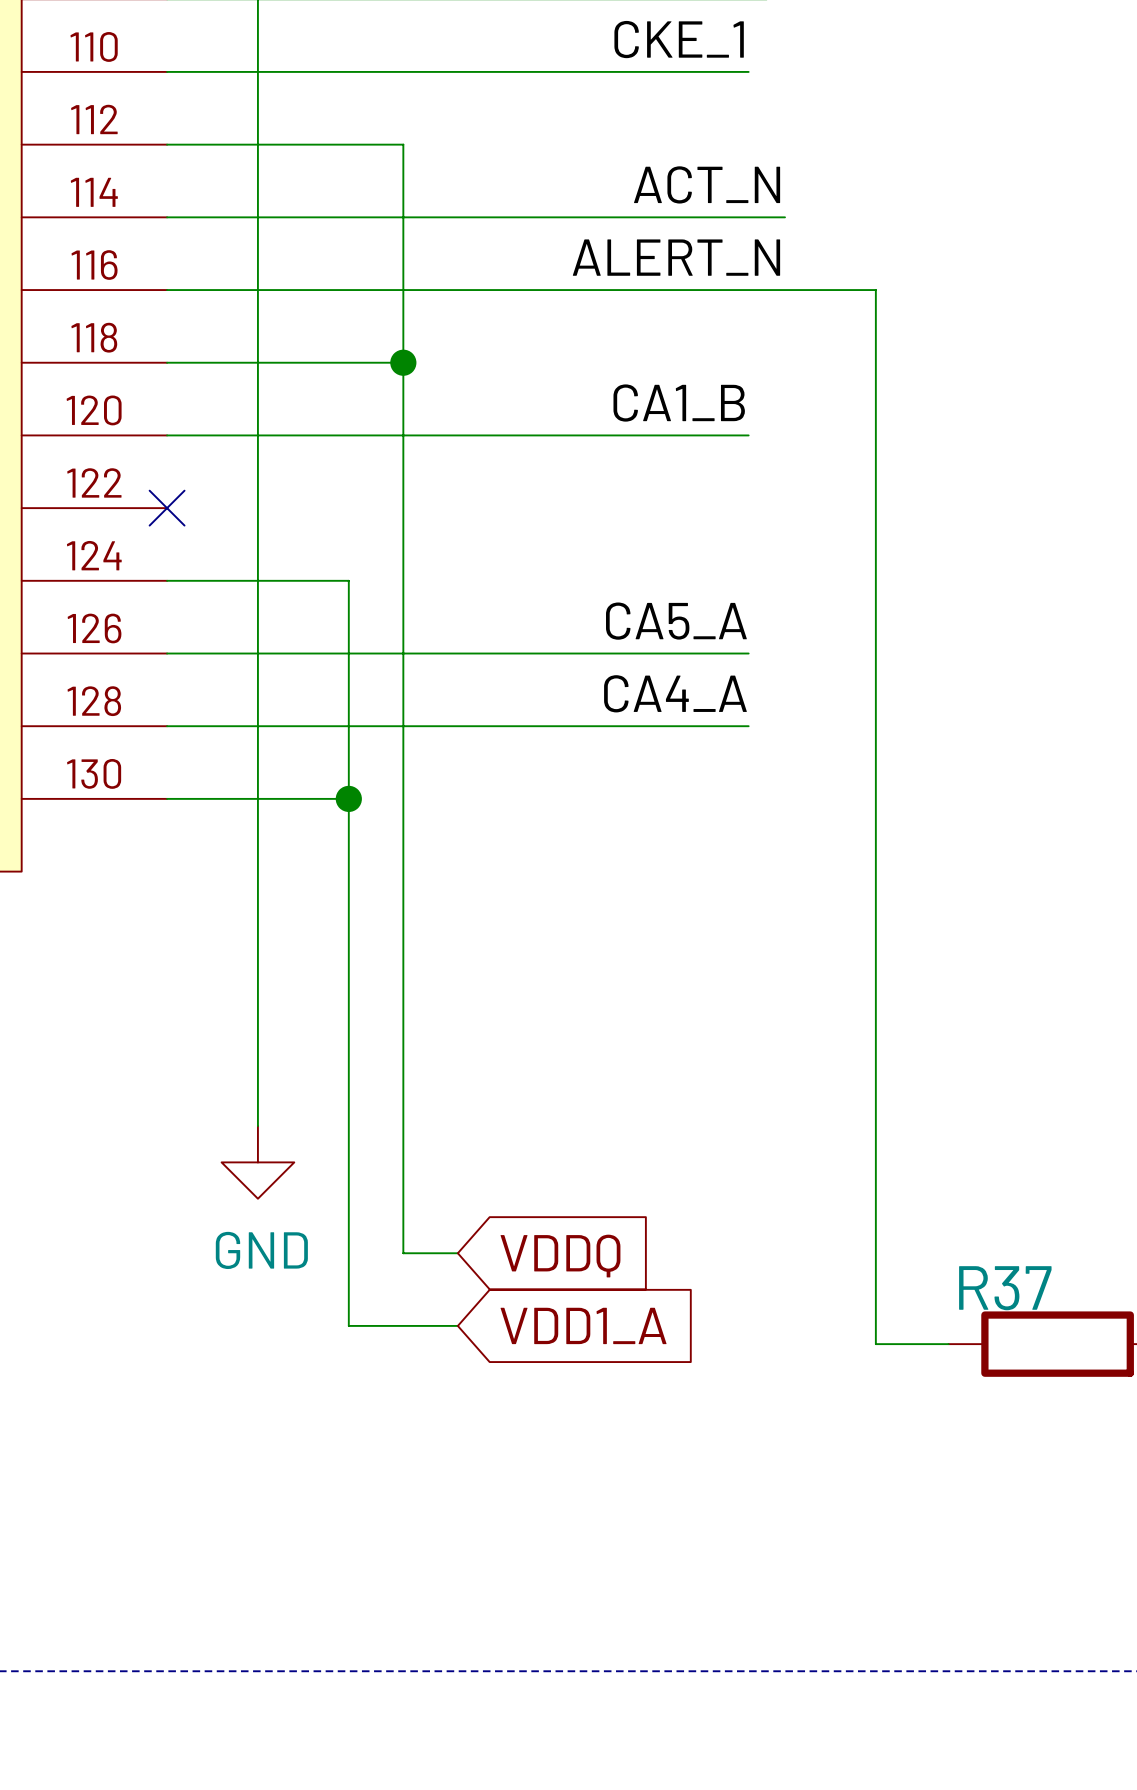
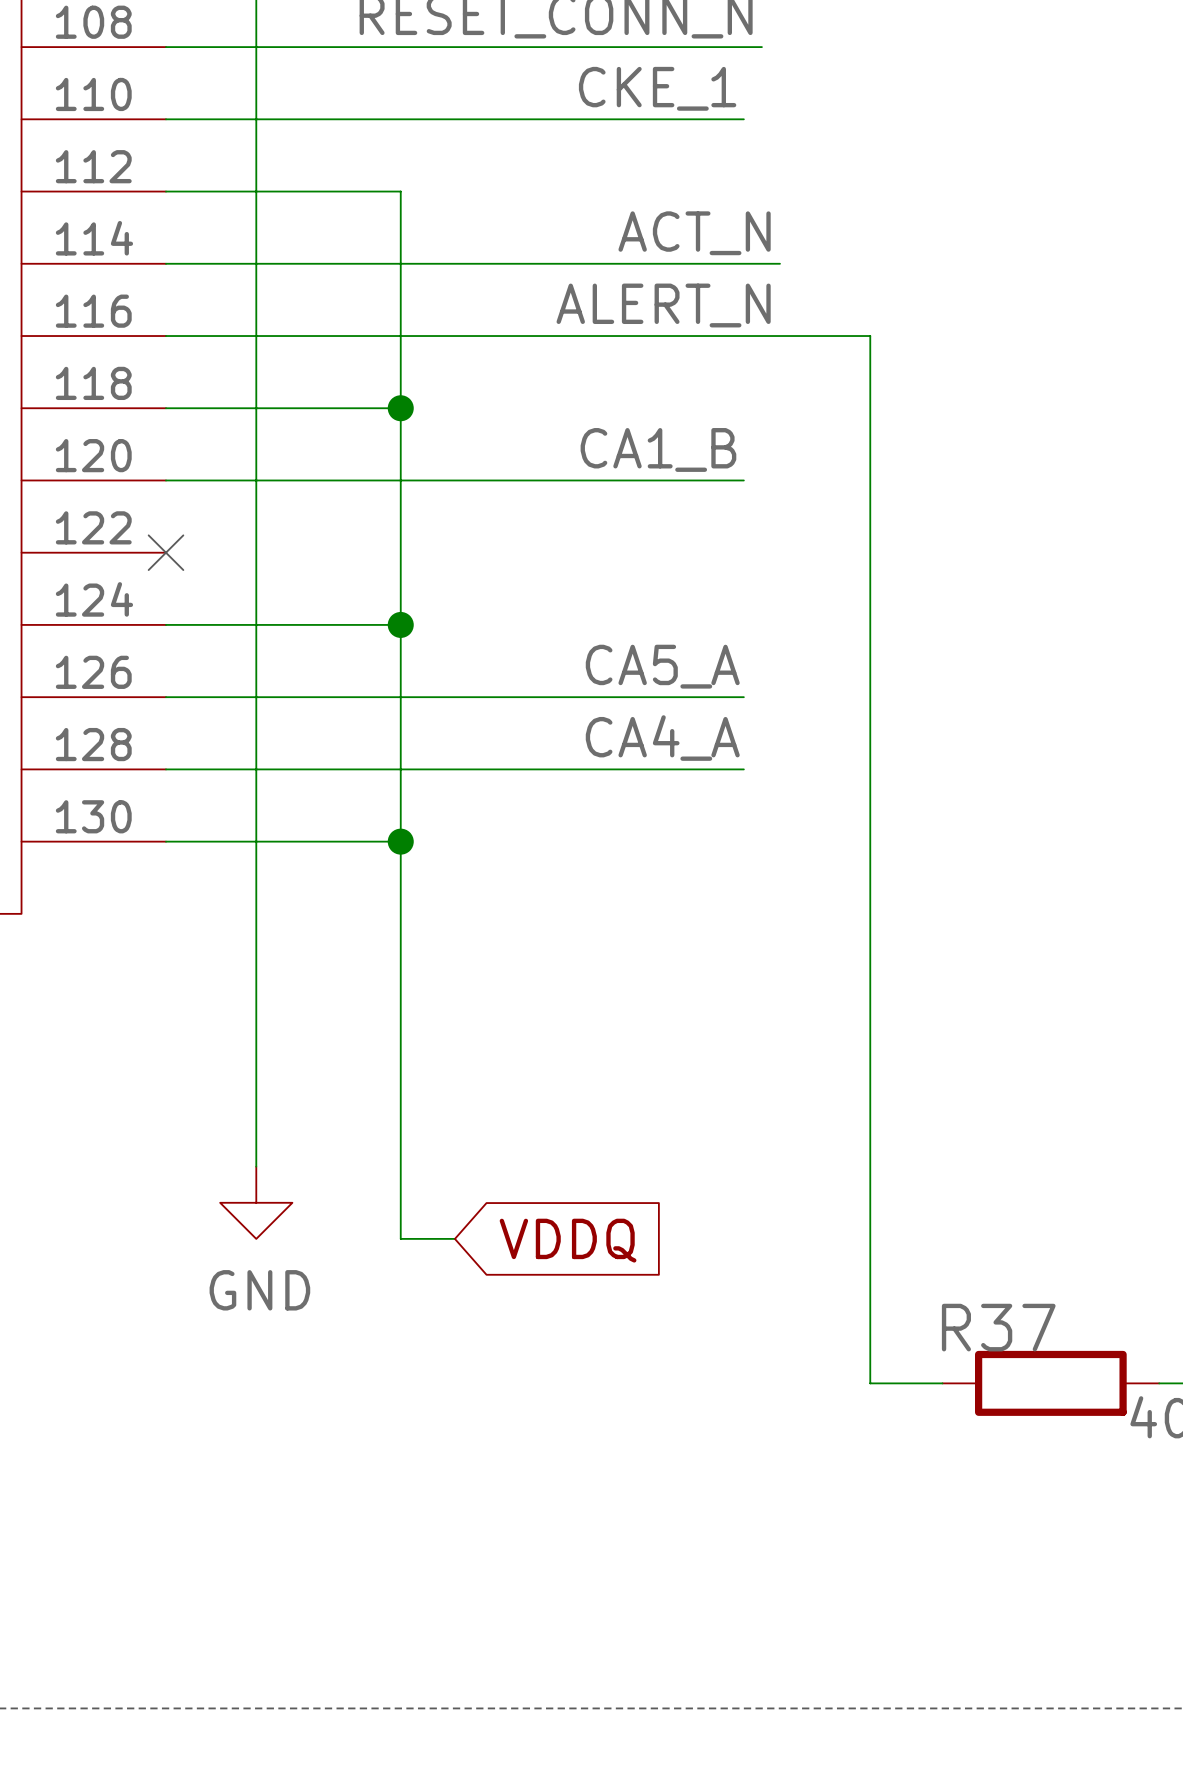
wire: (348, 580) (348, 1325) (457, 1325) -> (346, 624) (400, 624)
junction: none -> (400, 624)
wire: none -> (346, 841) (400, 841)
junction position: (348, 798) -> (400, 841)
wire: (403, 1198) (403, 1253) (457, 1253) -> (400, 1238) (454, 1238)
global label position: VDDQ (560, 1256) -> VDDQ (568, 1240)
global label: VDD1_A (583, 1325) -> none

